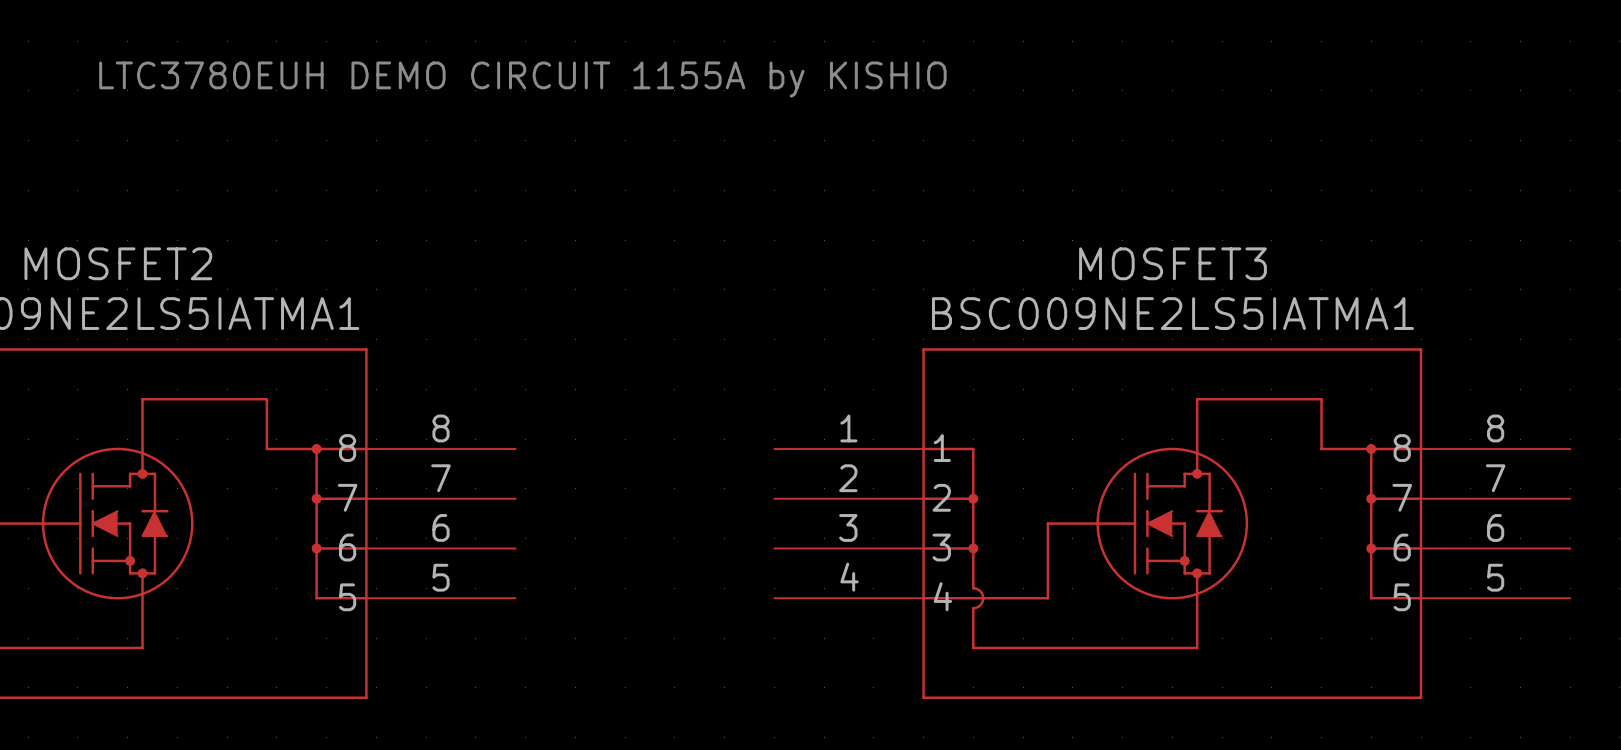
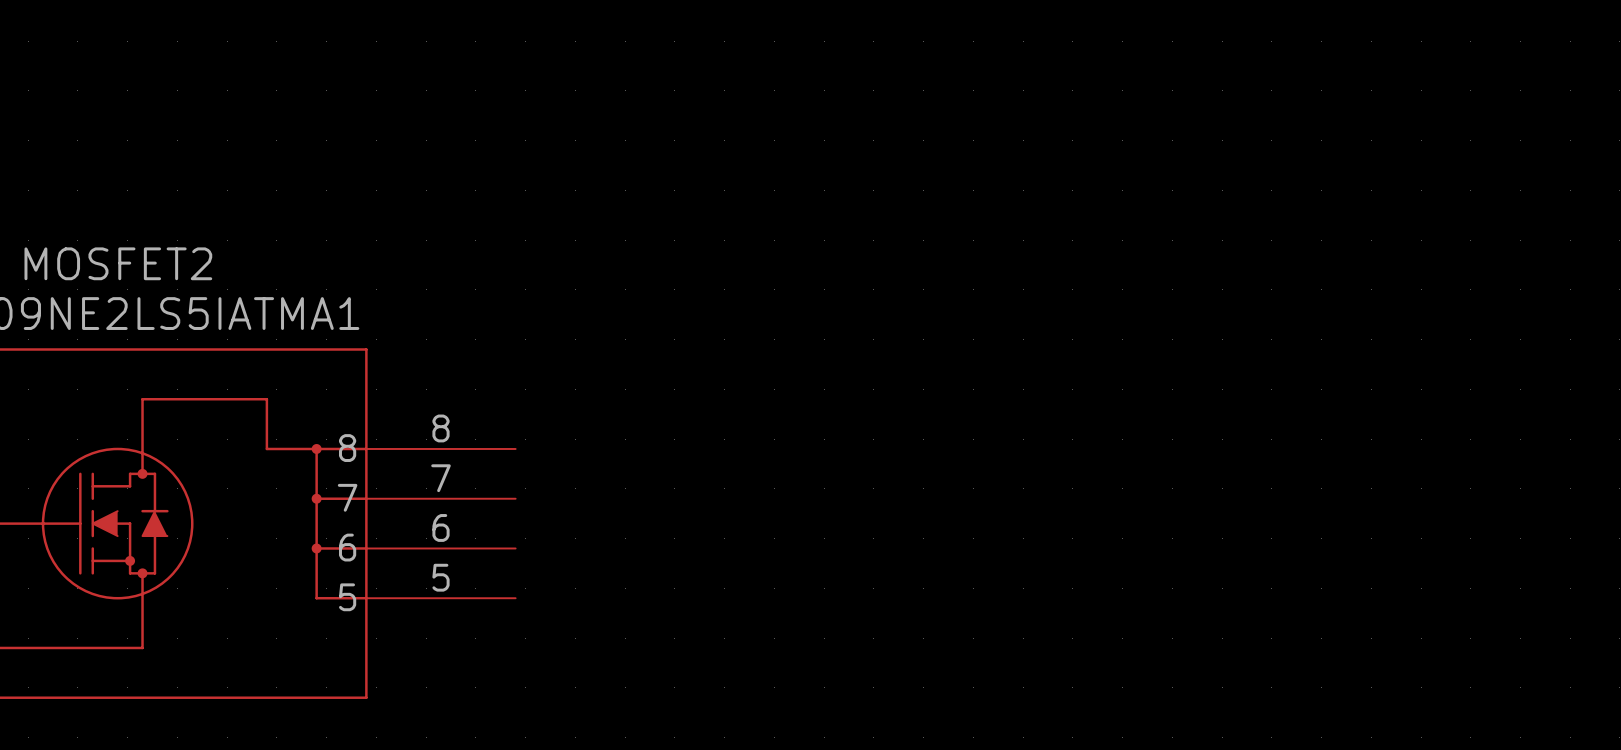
text: LTC3780EUH DEMO CIRCUIT 1155A by KISHIO (522, 79) -> none
MOSFET3: BSC009NE2LS5IATMA1 (1172, 523) -> none

